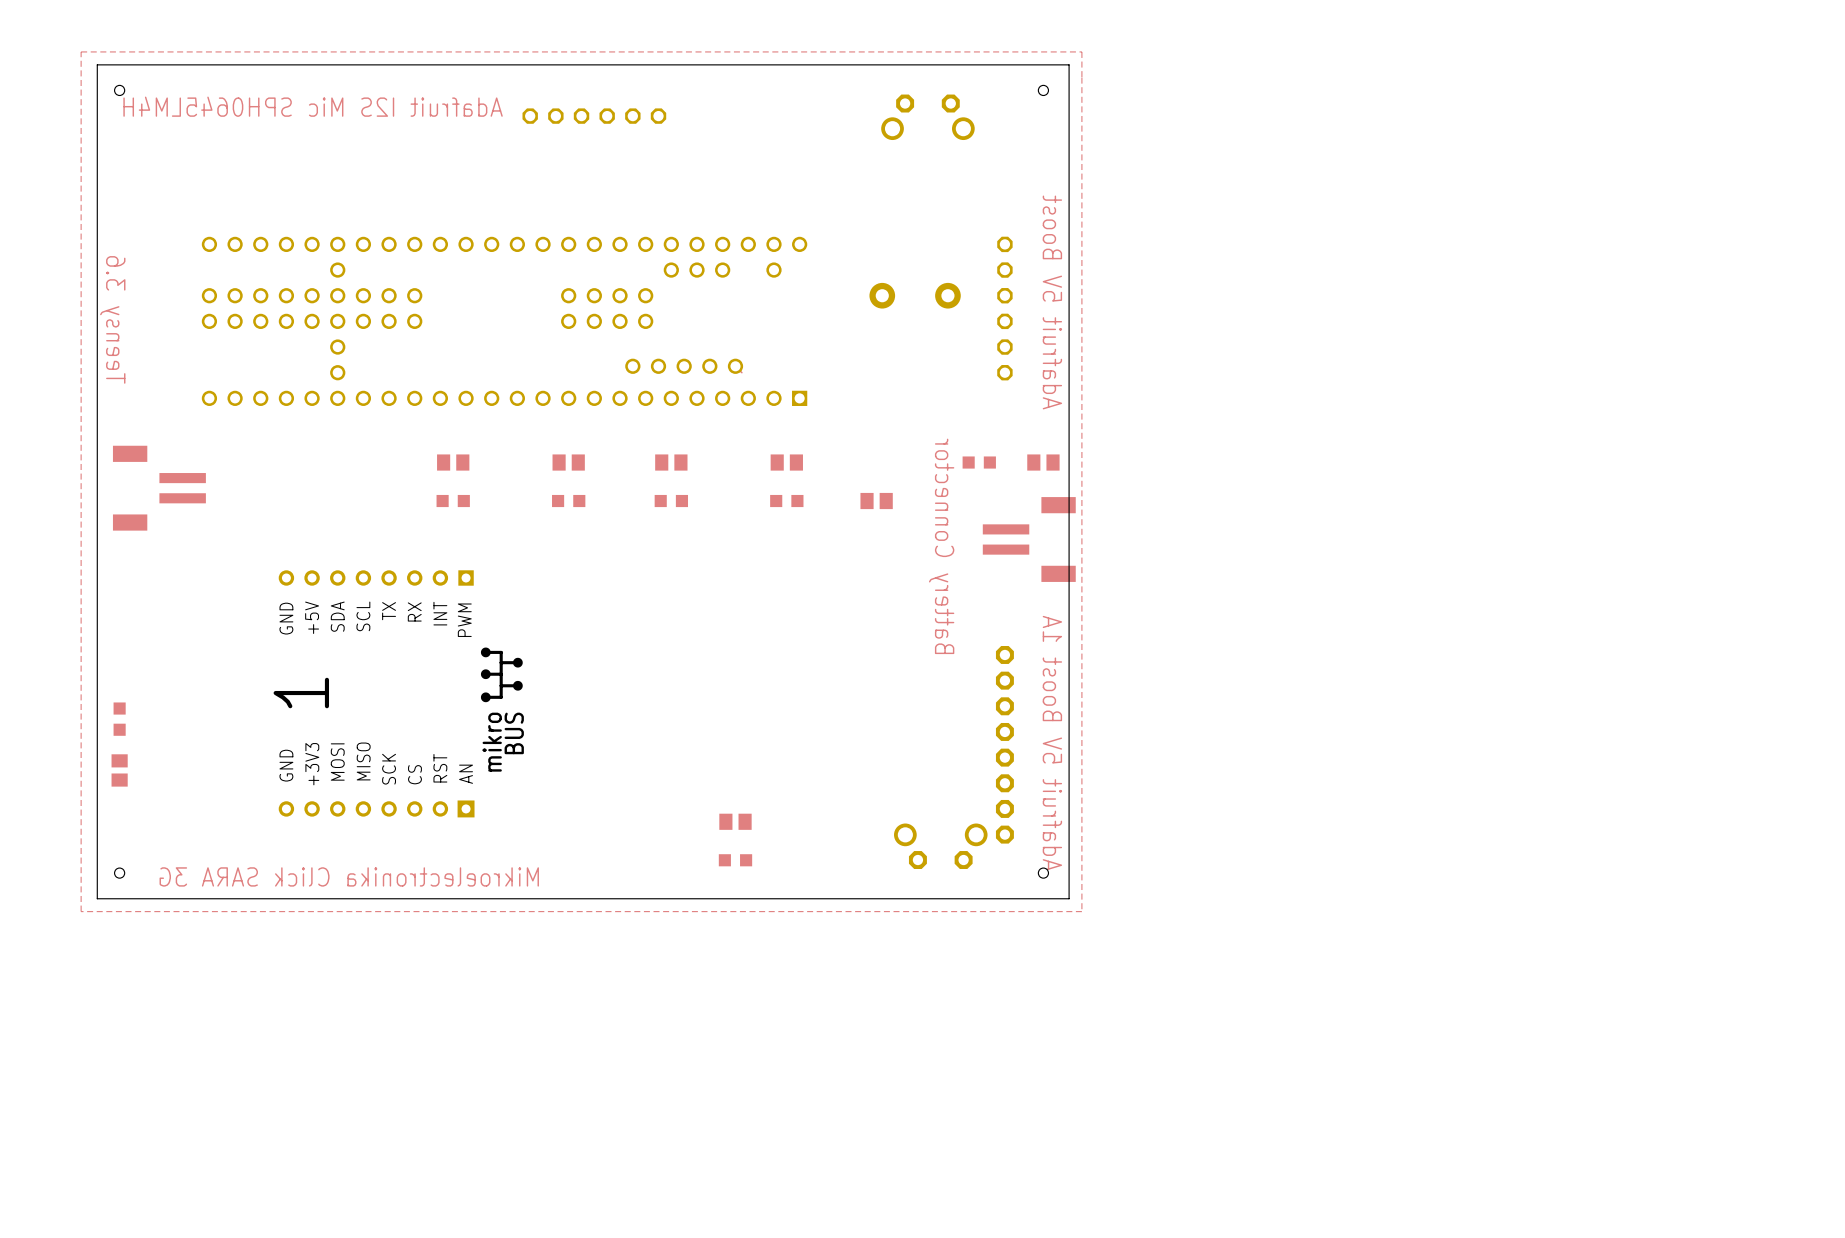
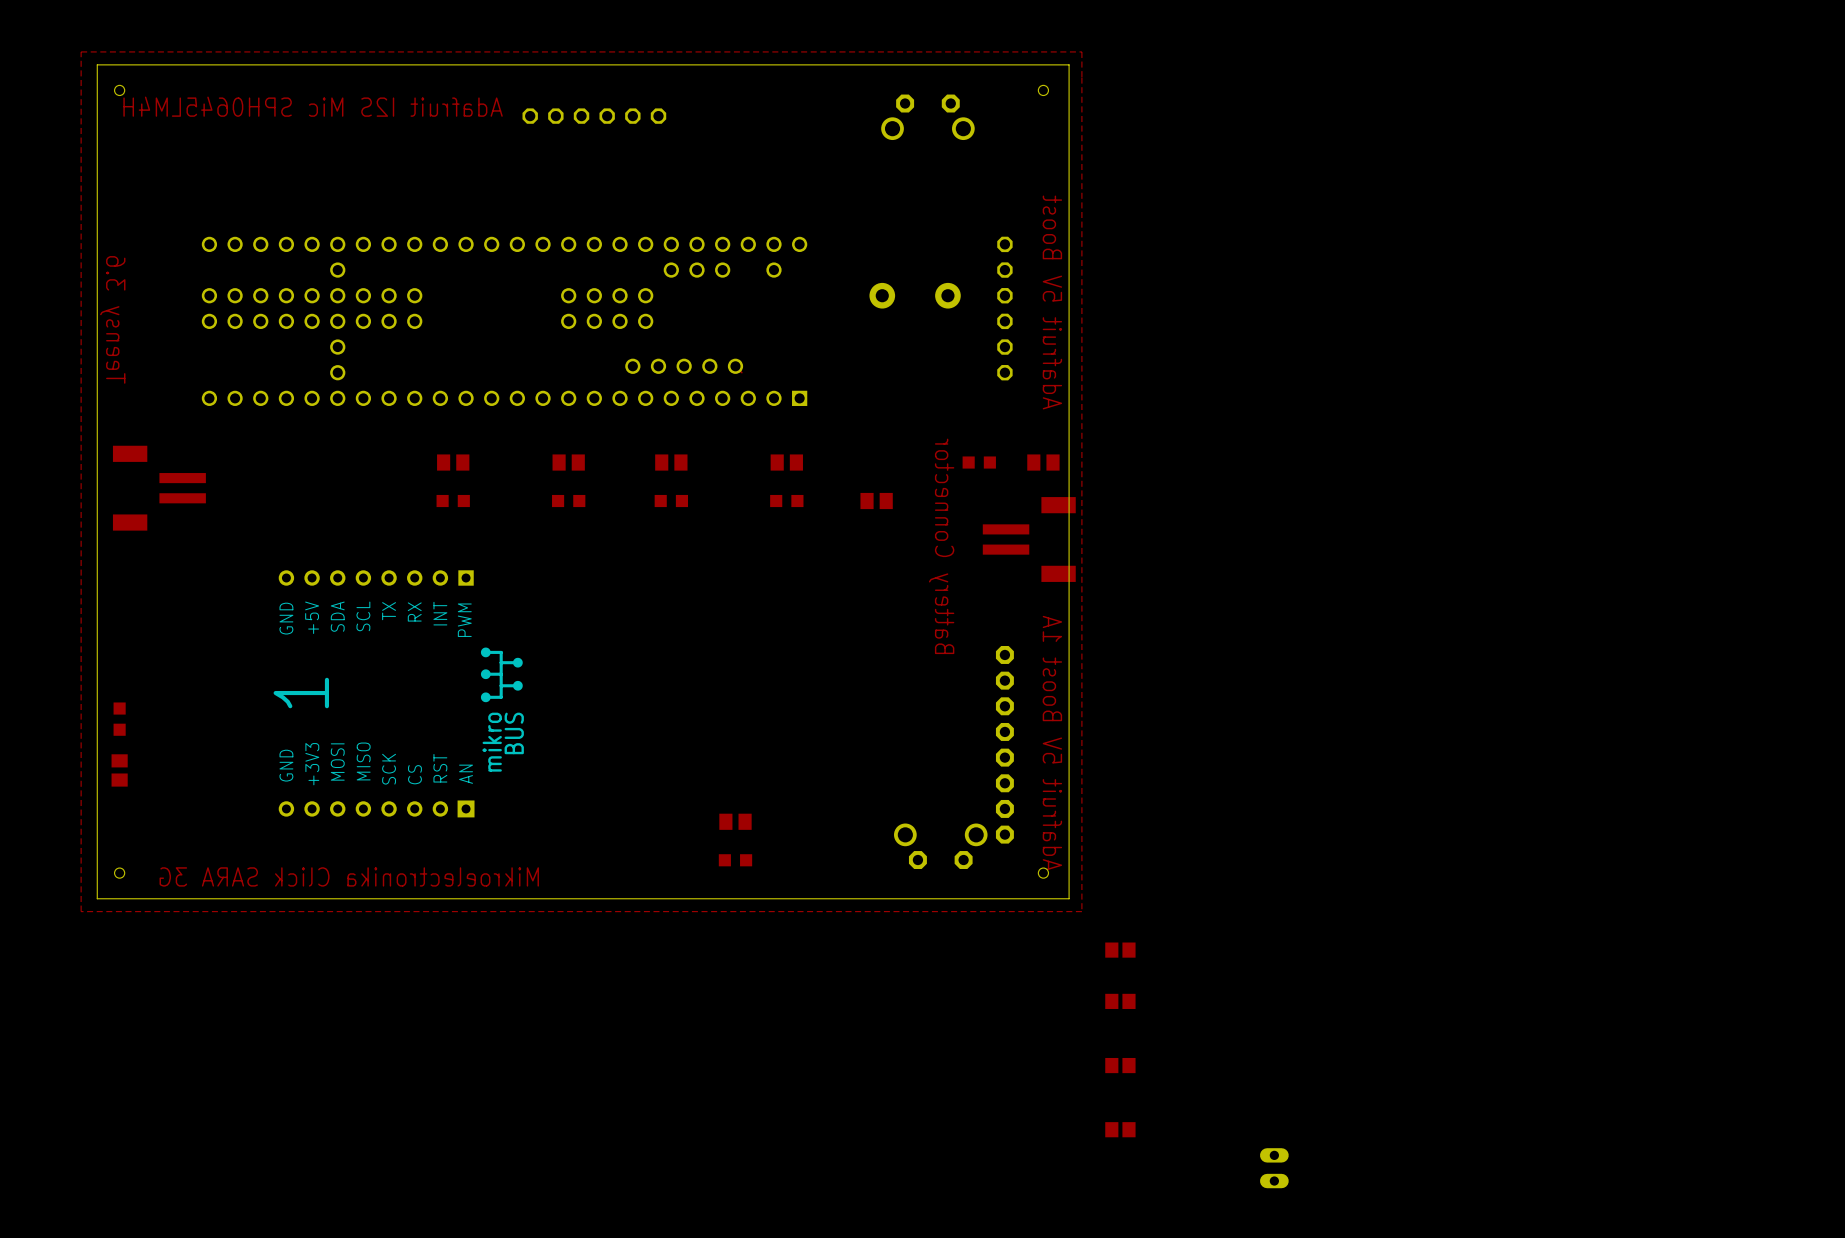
part: none -> (1120, 950)
part: none -> (1120, 1001)
part: none -> (1120, 1065)
part: none -> (1120, 1129)
part: none -> (1274, 1168)

